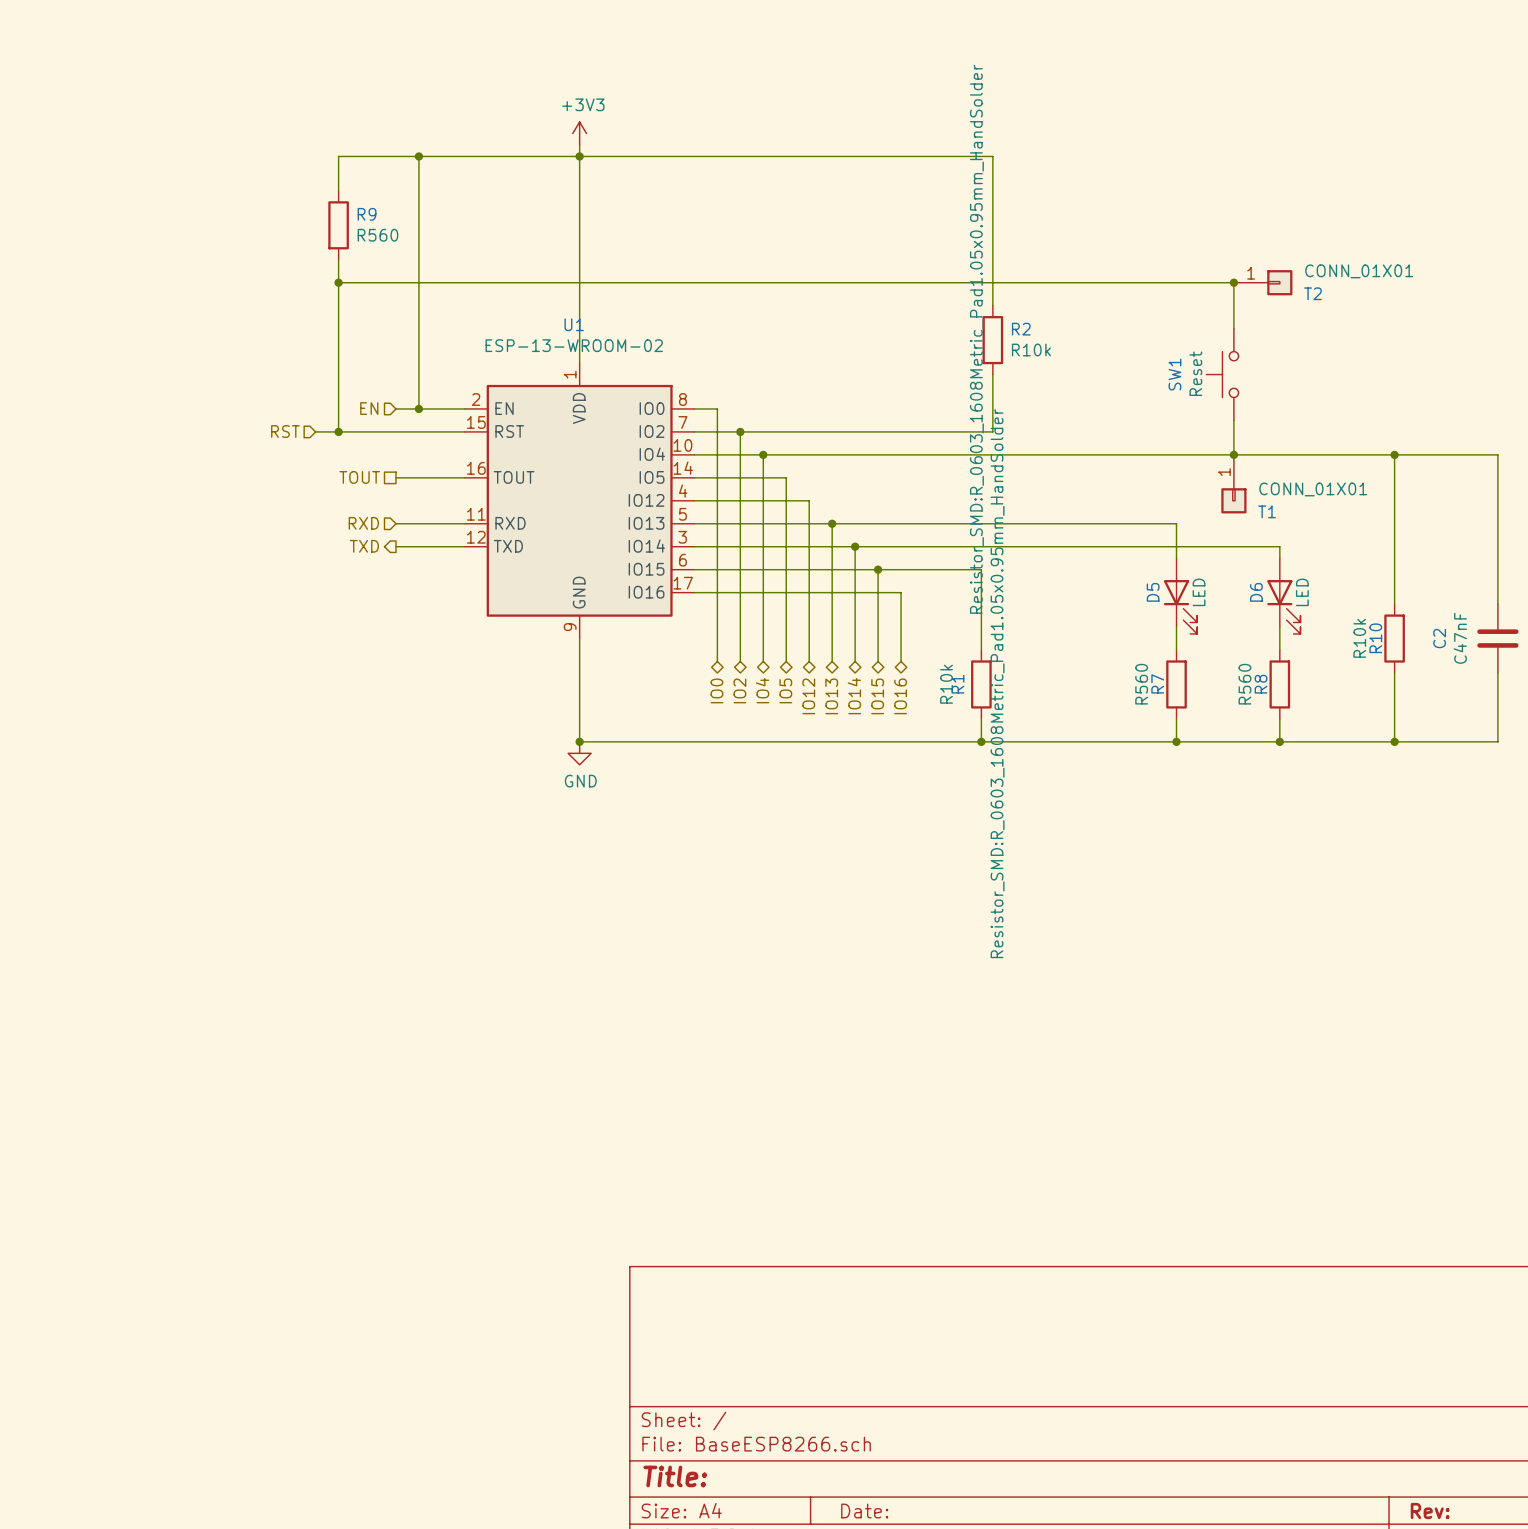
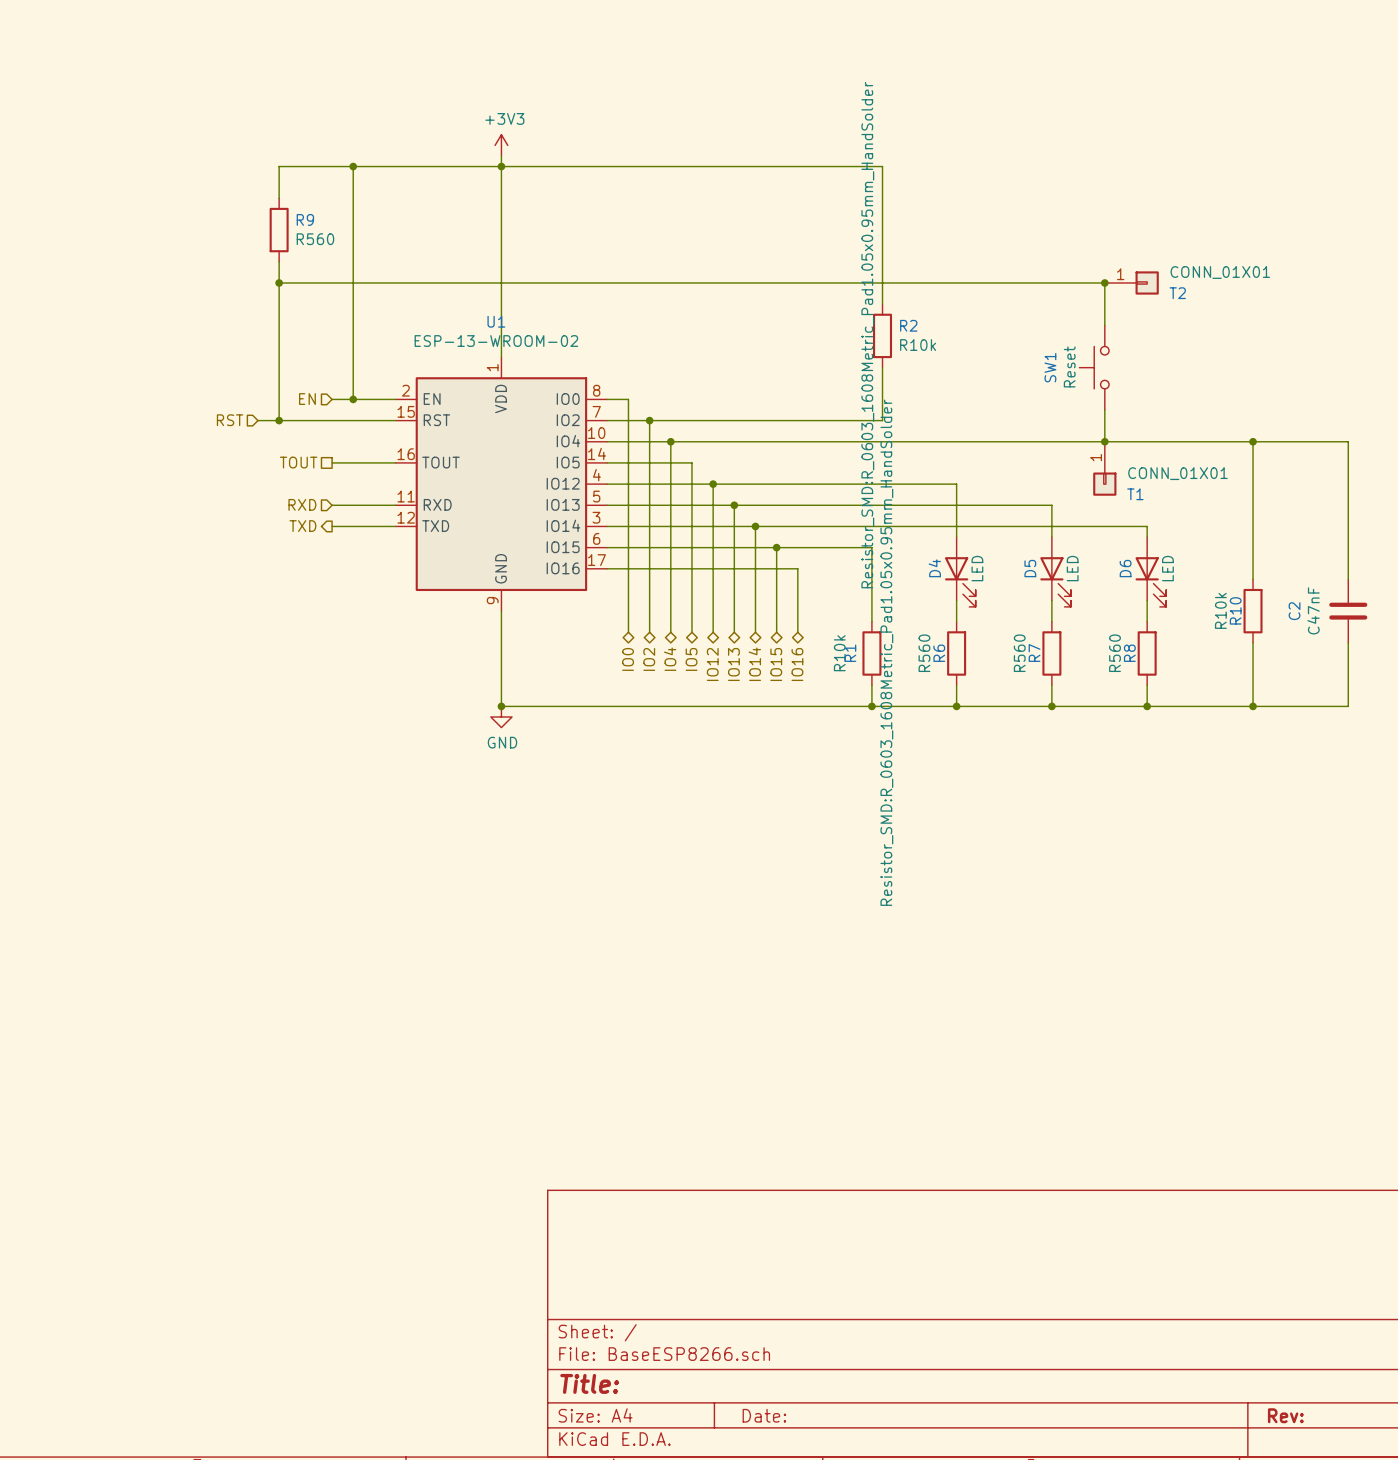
wire: none -> (713, 484) (956, 484) (956, 537)
junction: none -> (713, 484)
D4: none -> LED (960, 571)
wire: none -> (956, 600) (956, 621)
R6: none -> R560 (956, 653)
wire: none -> (956, 685) (956, 706)
junction: none -> (956, 706)

